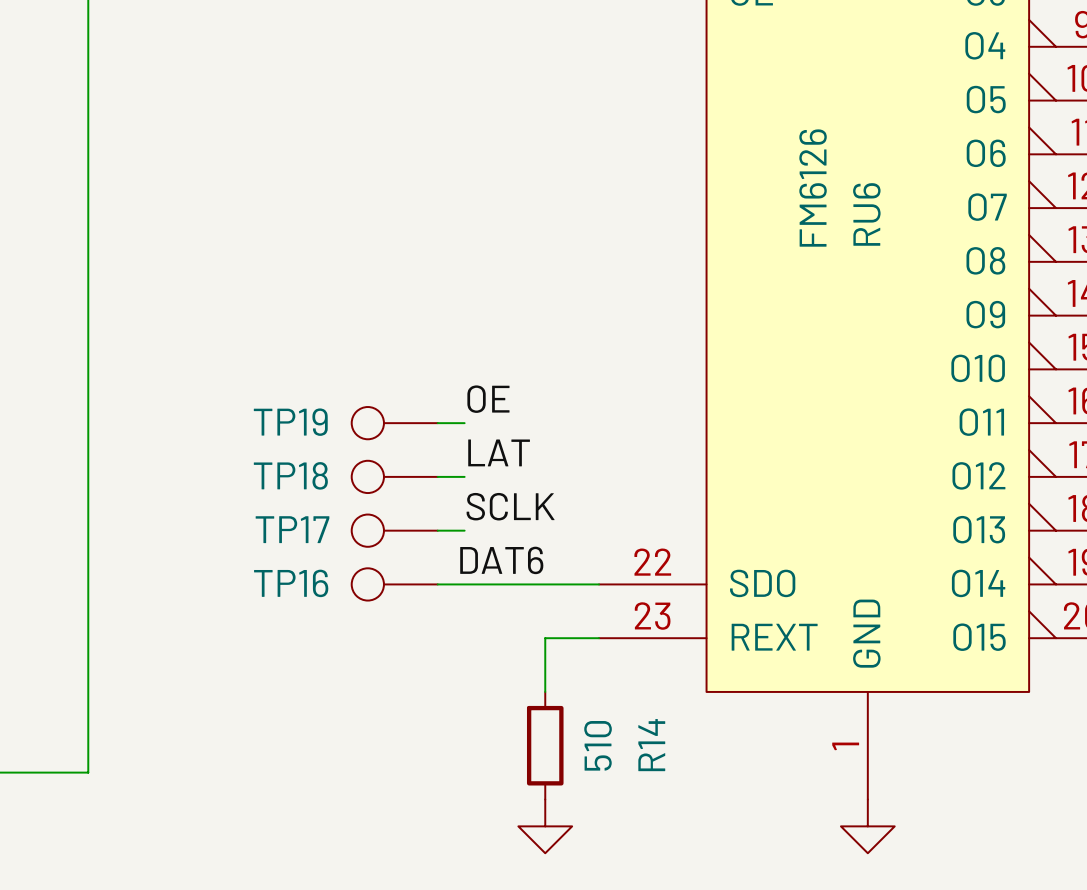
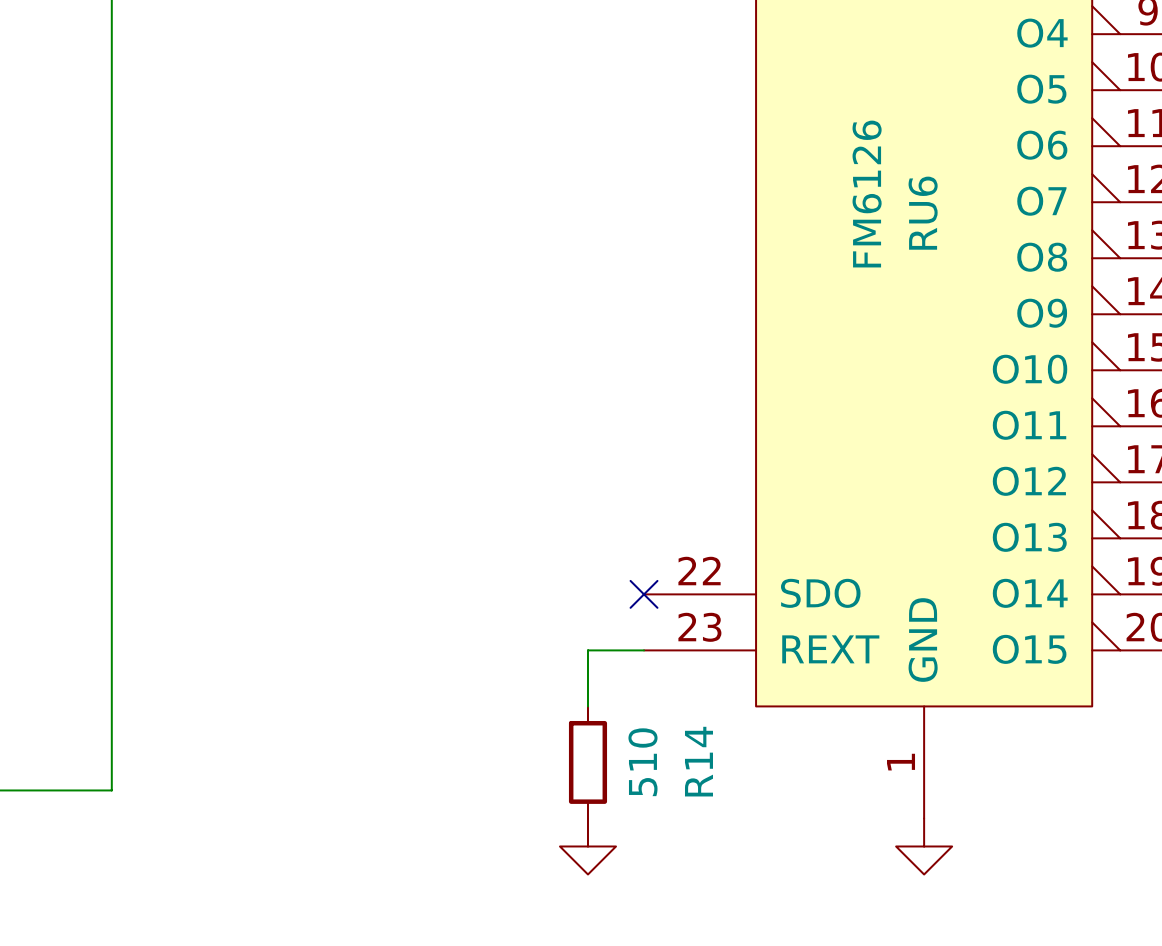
label: OE (488, 399) -> none
TP19: (394, 423) -> none
wire: (437, 423) (464, 423) -> none
label: LAT (499, 452) -> none
TP18: (394, 476) -> none
wire: (437, 476) (464, 476) -> none
label: SCLK (510, 506) -> none
TP17: (394, 530) -> none
wire: (437, 530) (464, 530) -> none
label: DAT6 (501, 560) -> none
TP16: (394, 584) -> none
wire: (437, 584) (599, 584) -> none
no-connect mark: none -> (644, 594)

